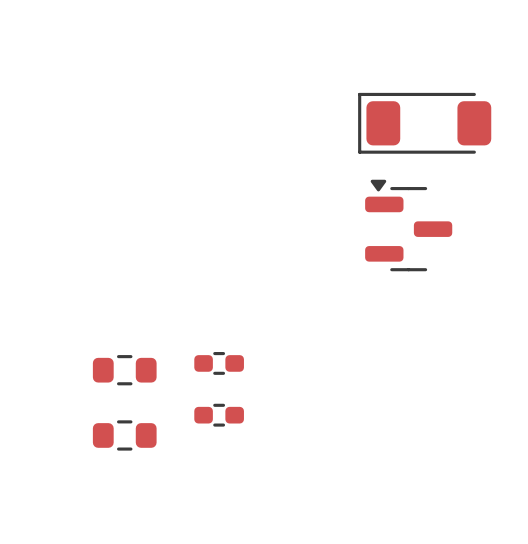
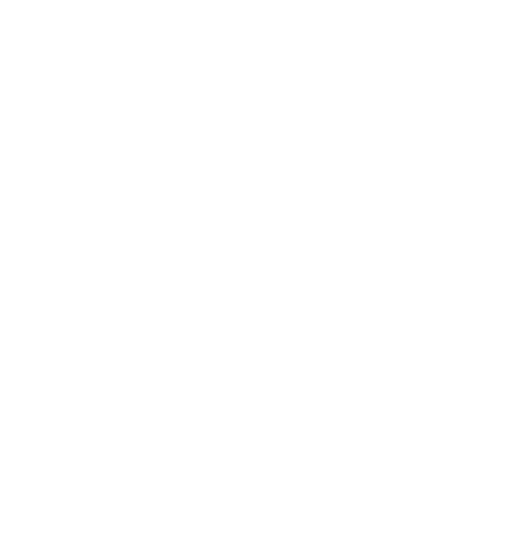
part: (424, 123) -> none
part: (408, 225) -> none
part: (219, 363) -> none
part: (124, 370) -> none
part: (219, 415) -> none
part: (124, 435) -> none

